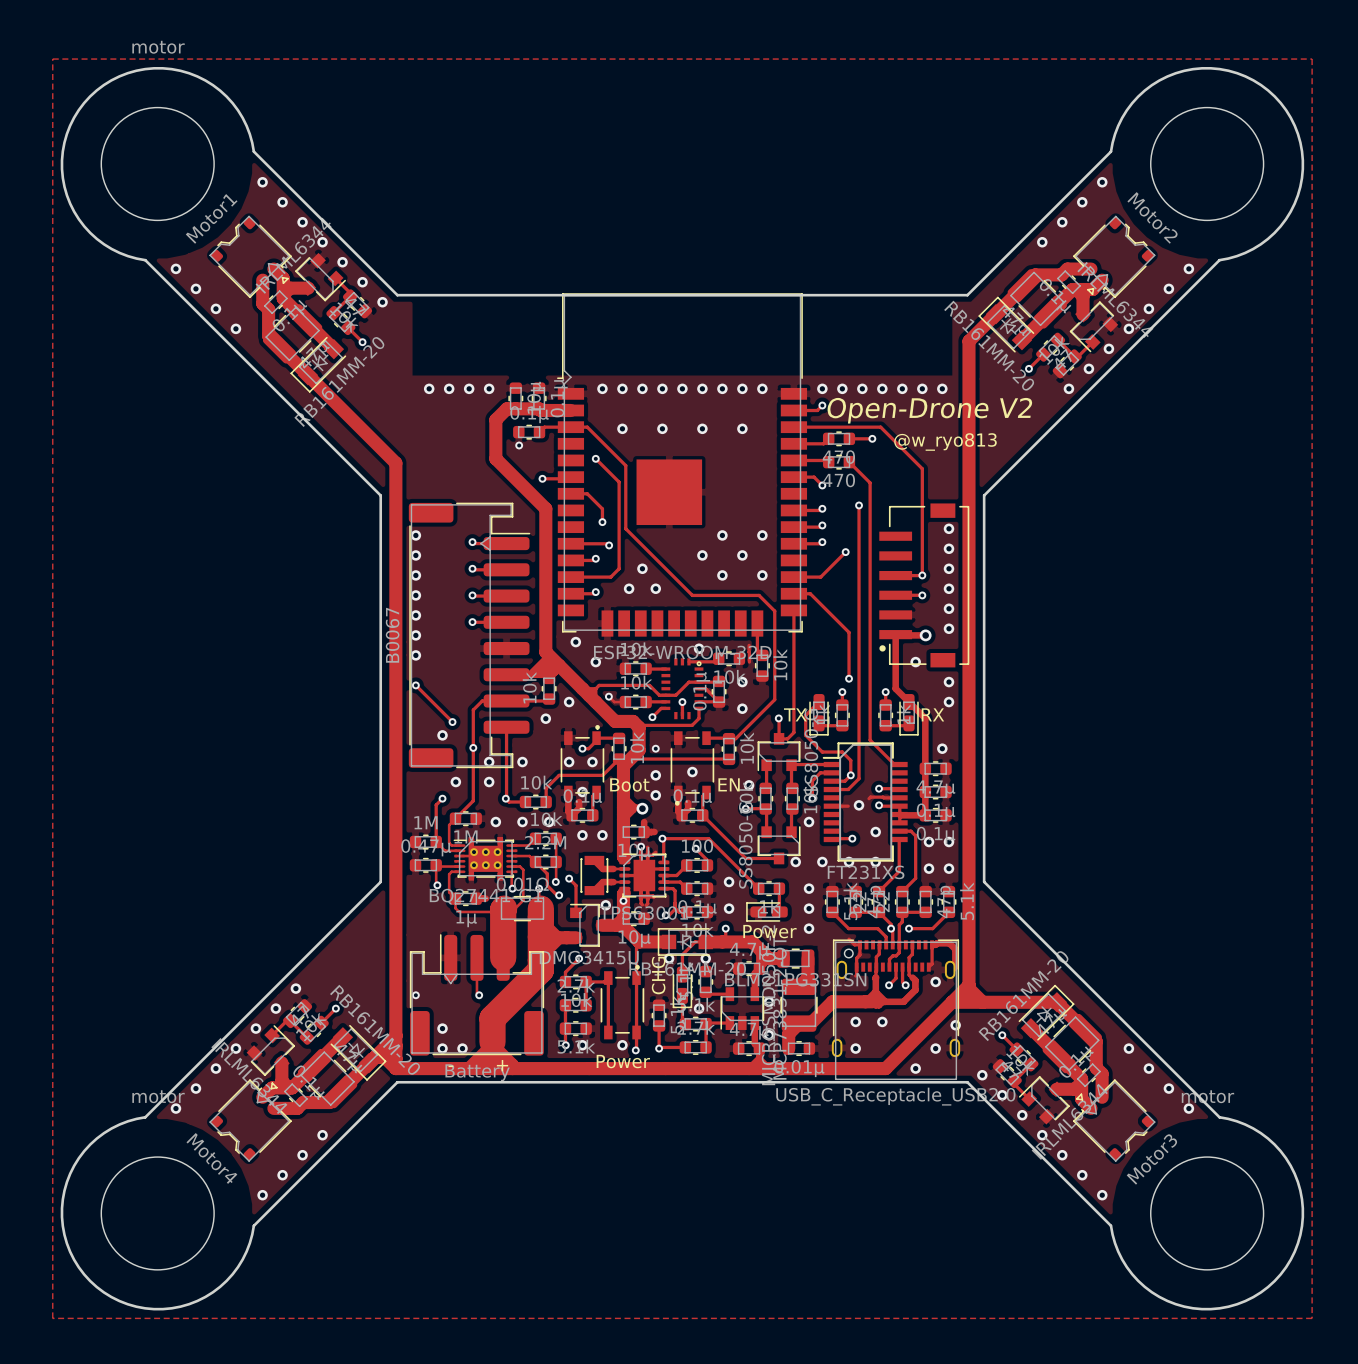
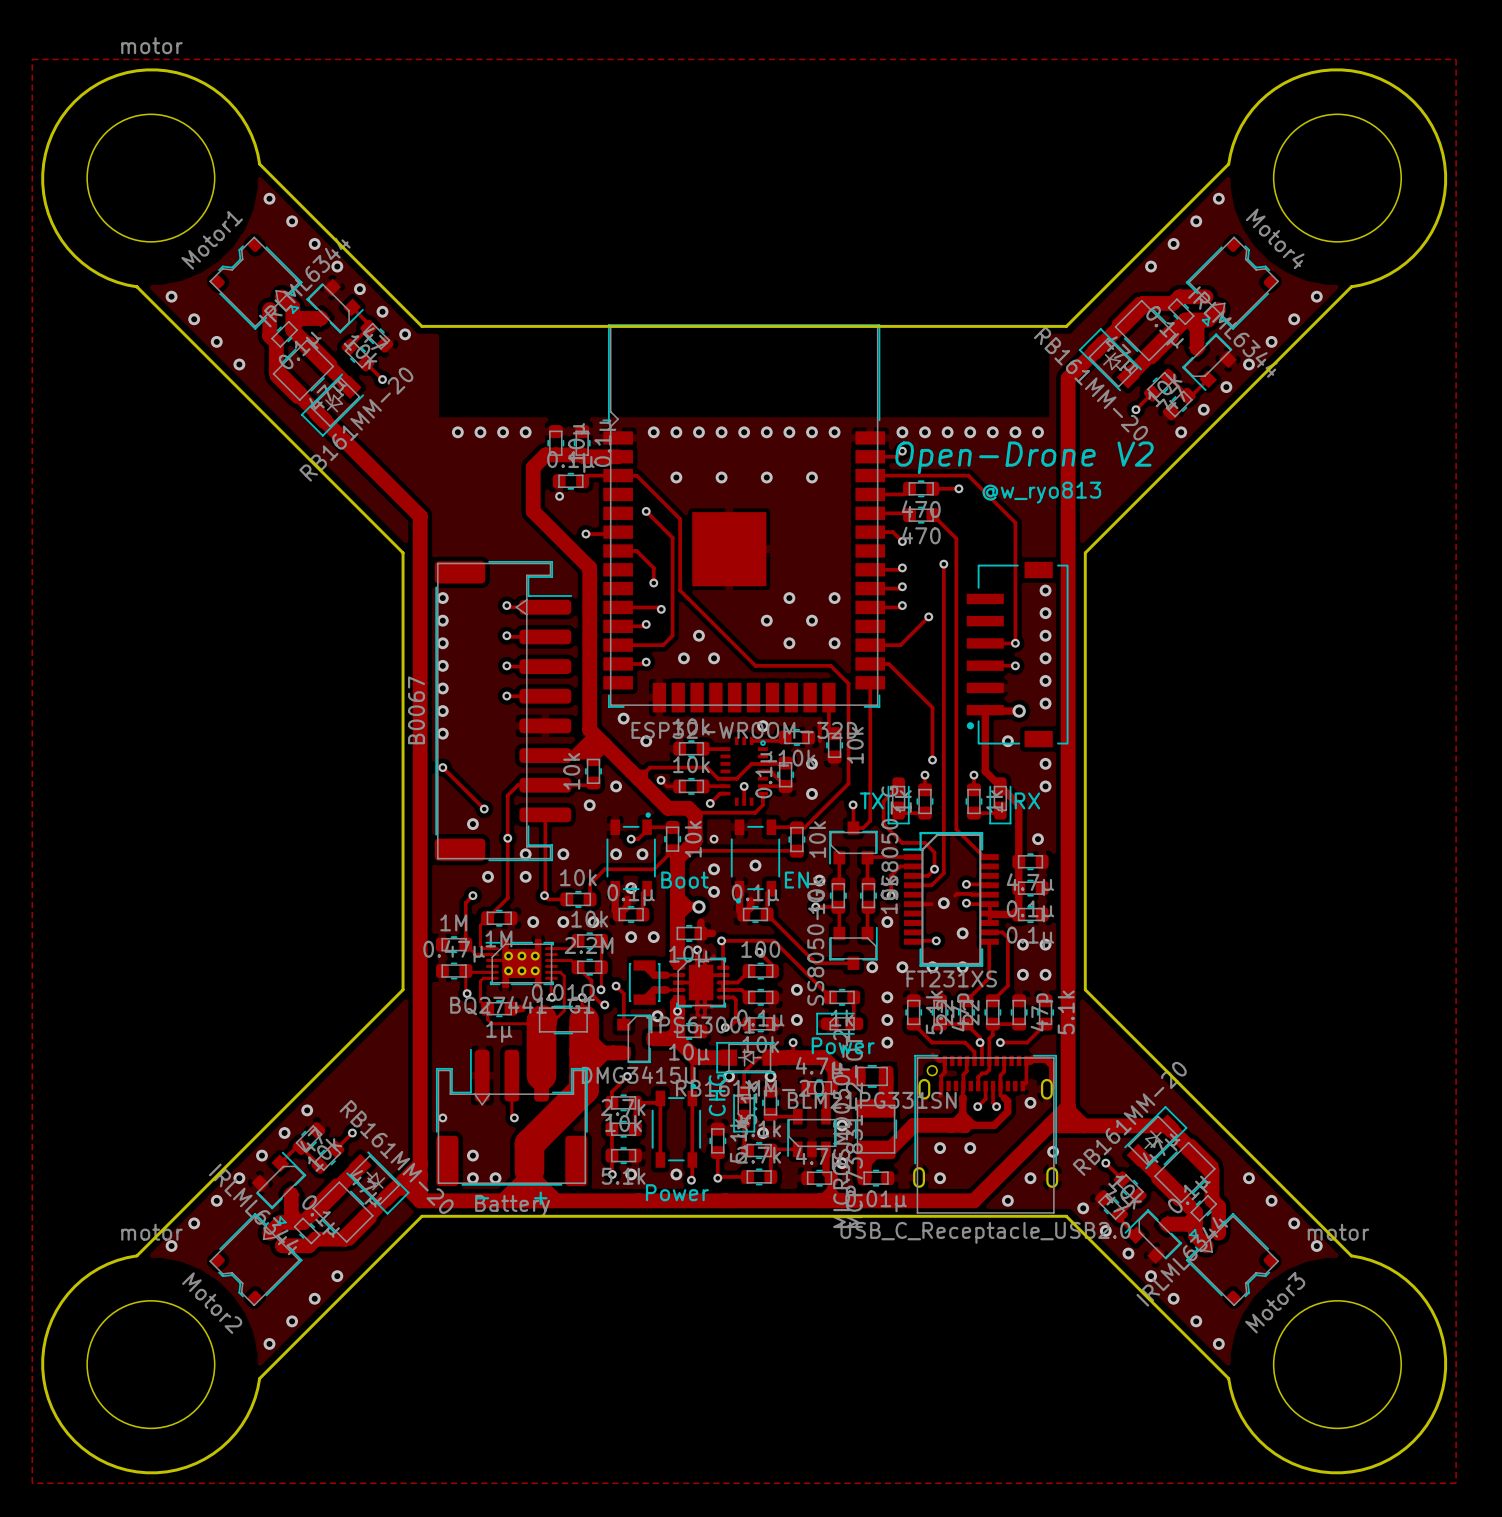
part value: Motor2 (1152, 217) -> Motor4 (1275, 238)
part value: Motor4 (211, 1158) -> Motor2 (212, 1303)

